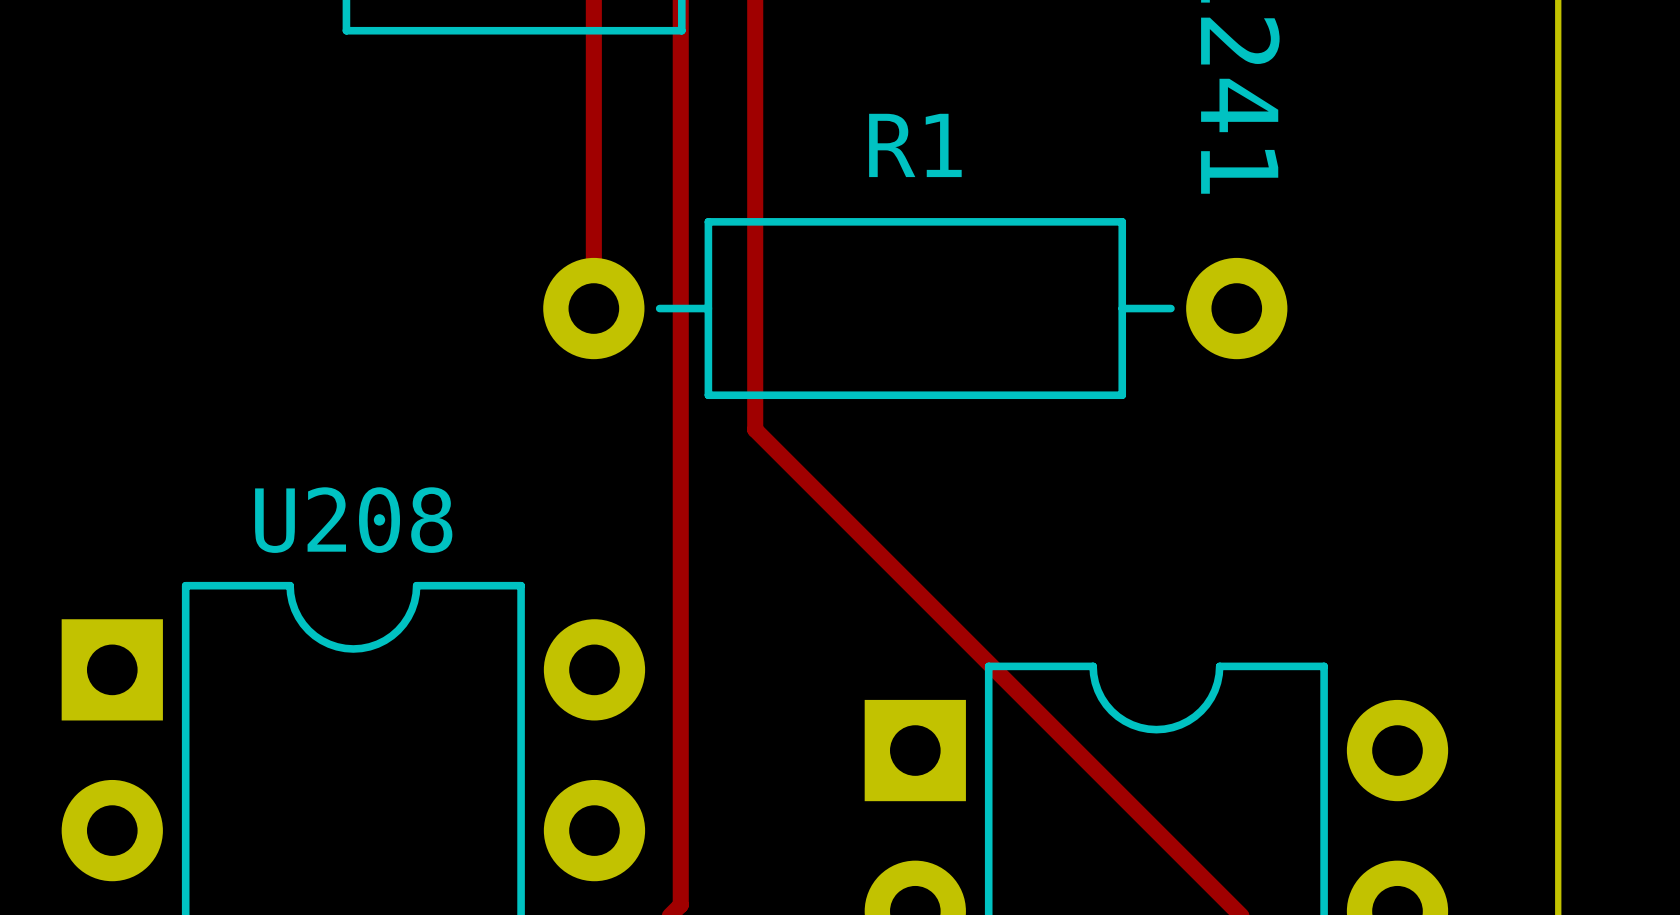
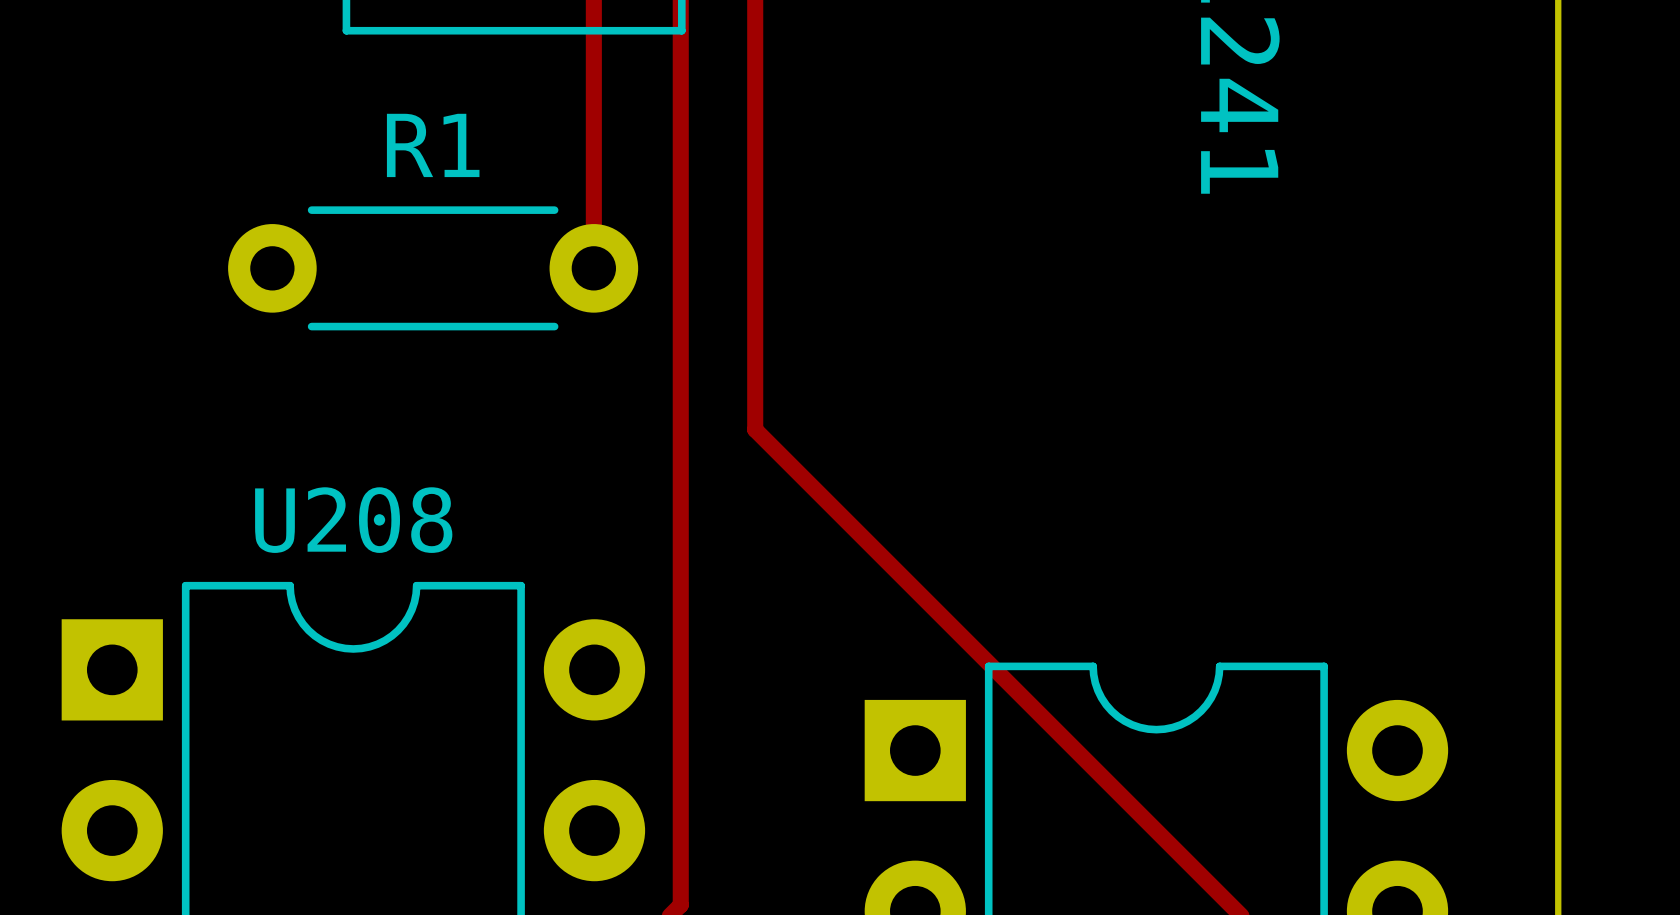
R1 footprint: [543, 218, 1288, 400] -> [228, 206, 639, 331]

